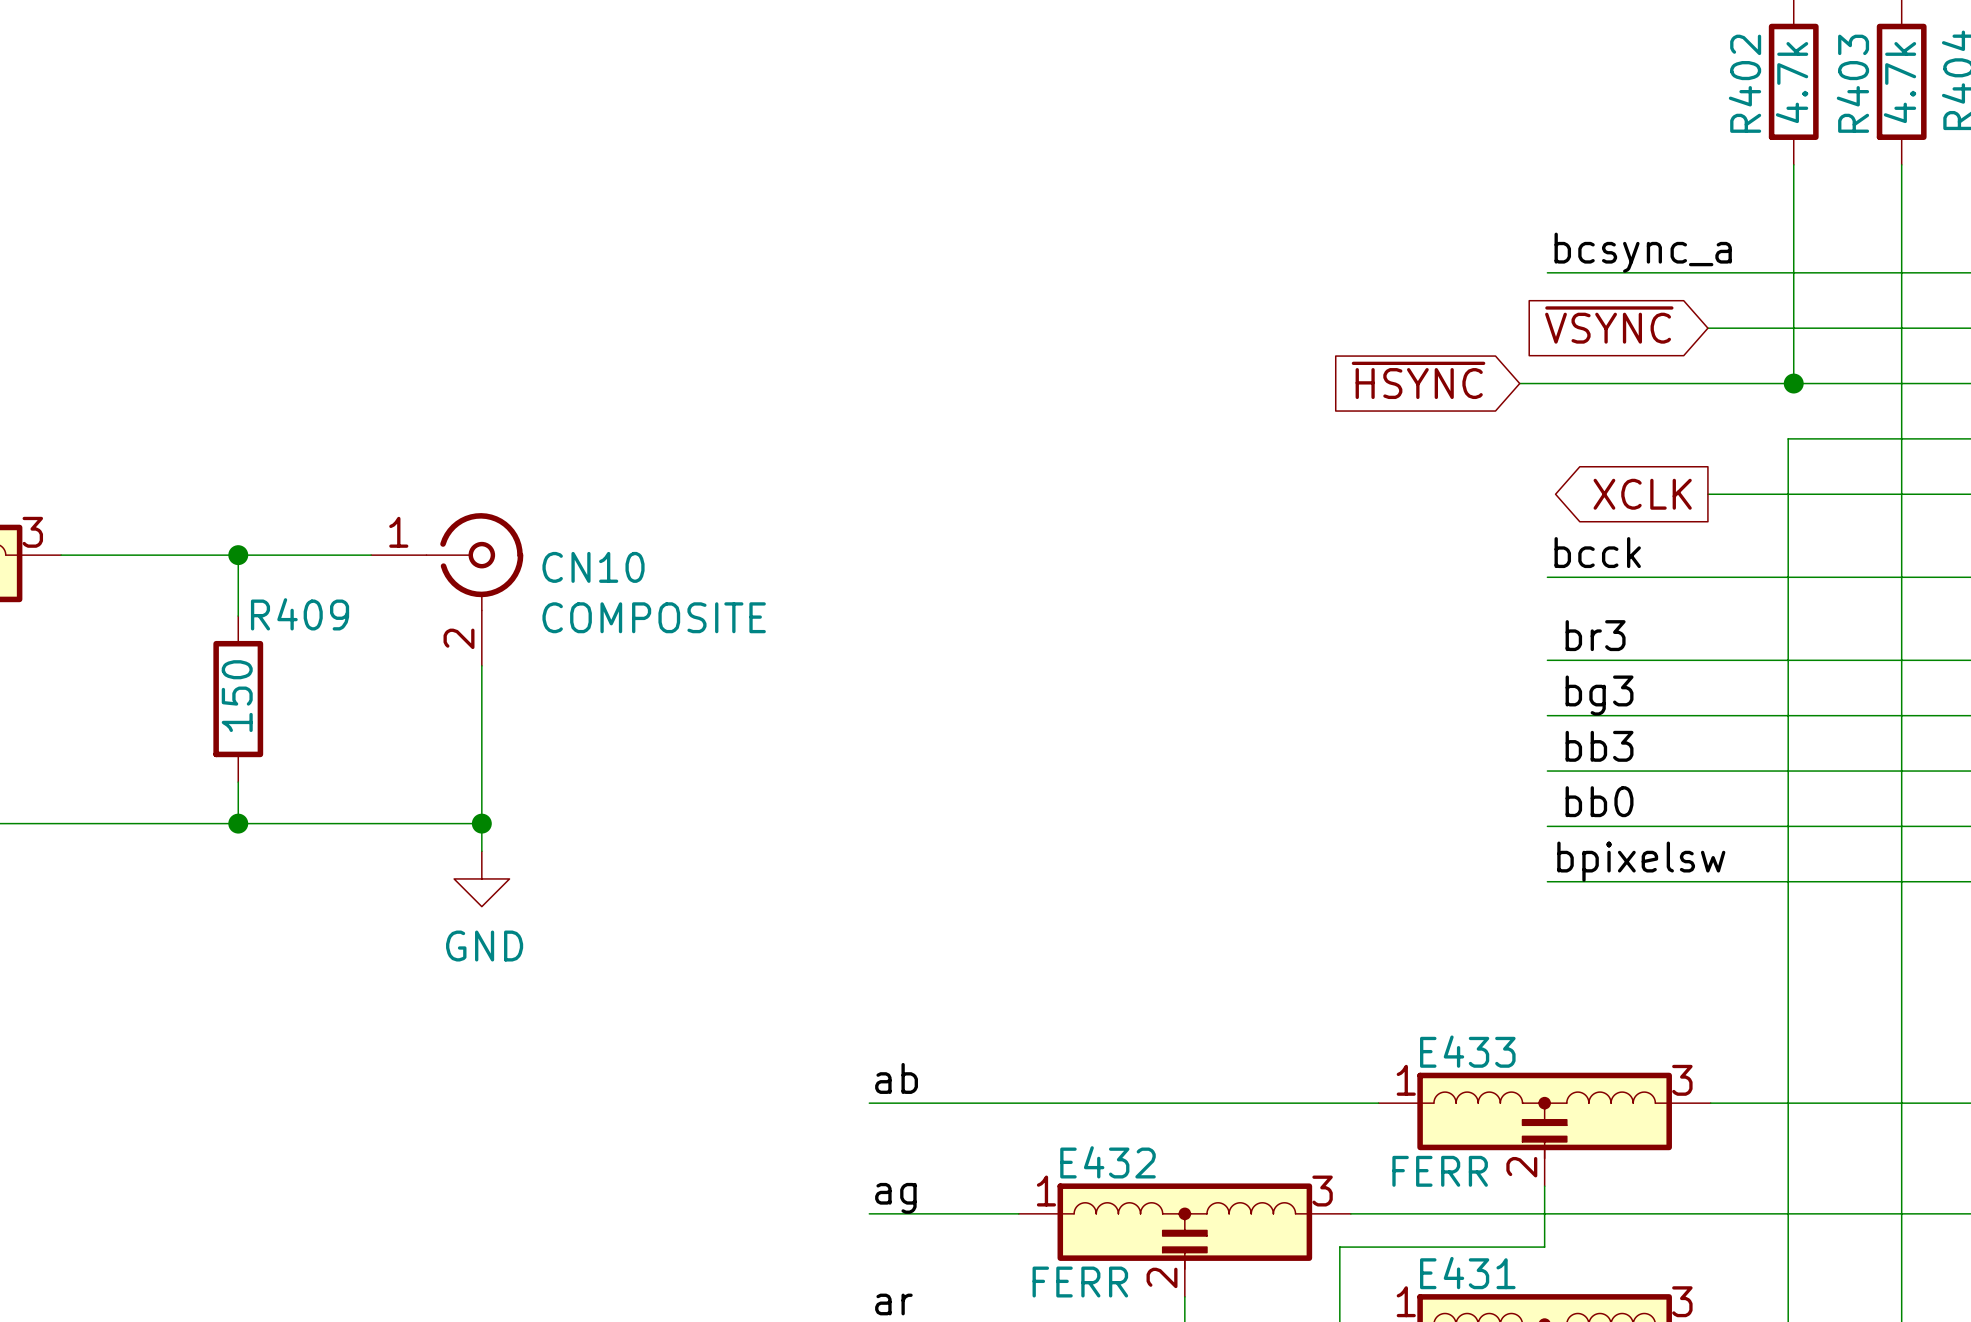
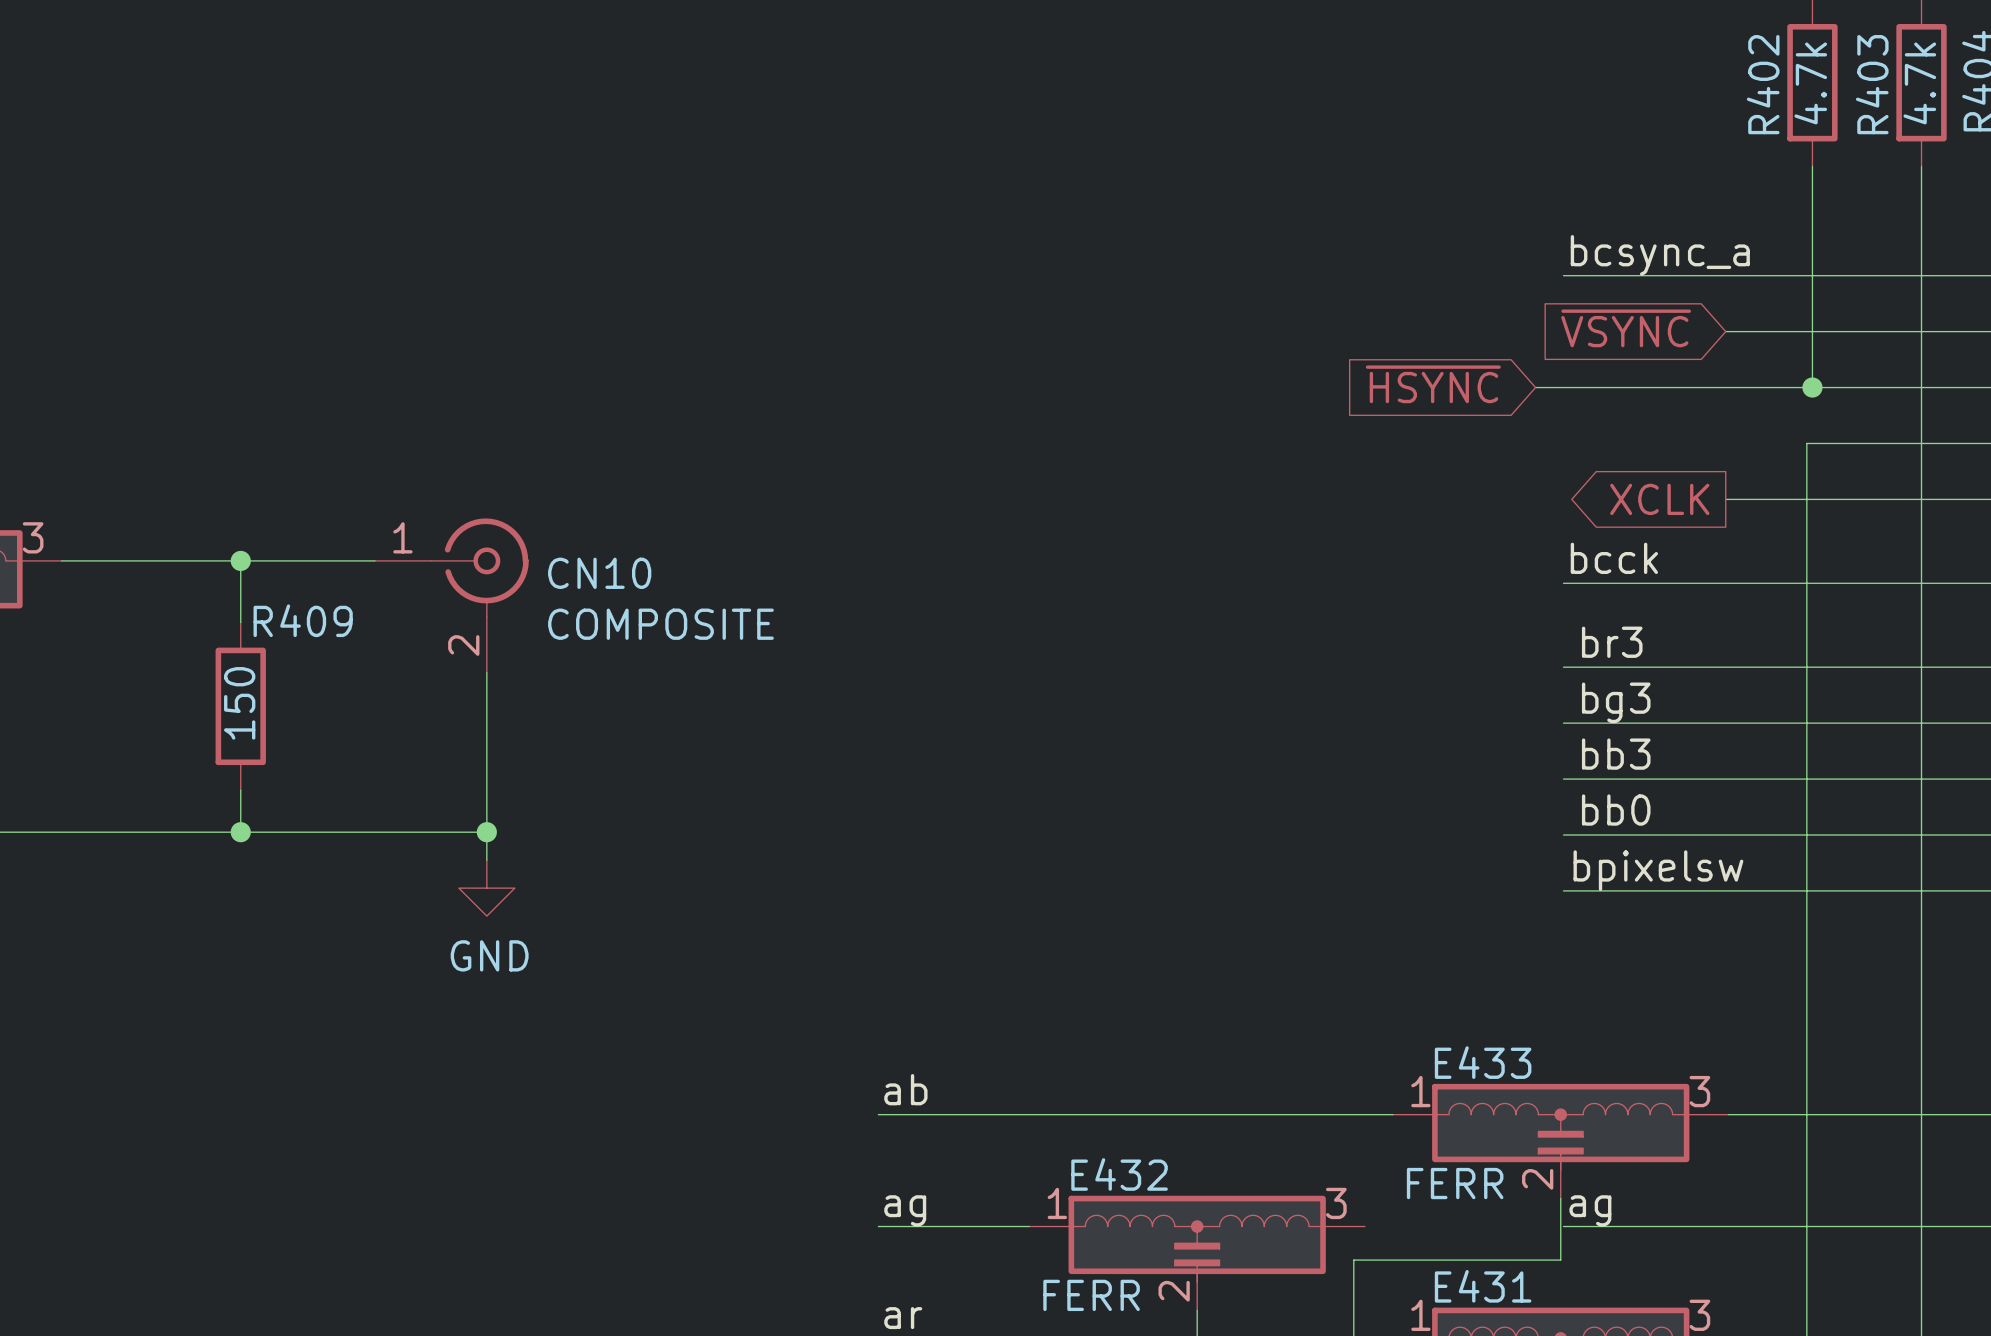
label: none -> ag (1590, 1210)
wire: (1350, 1213) (1547, 1213) -> none

